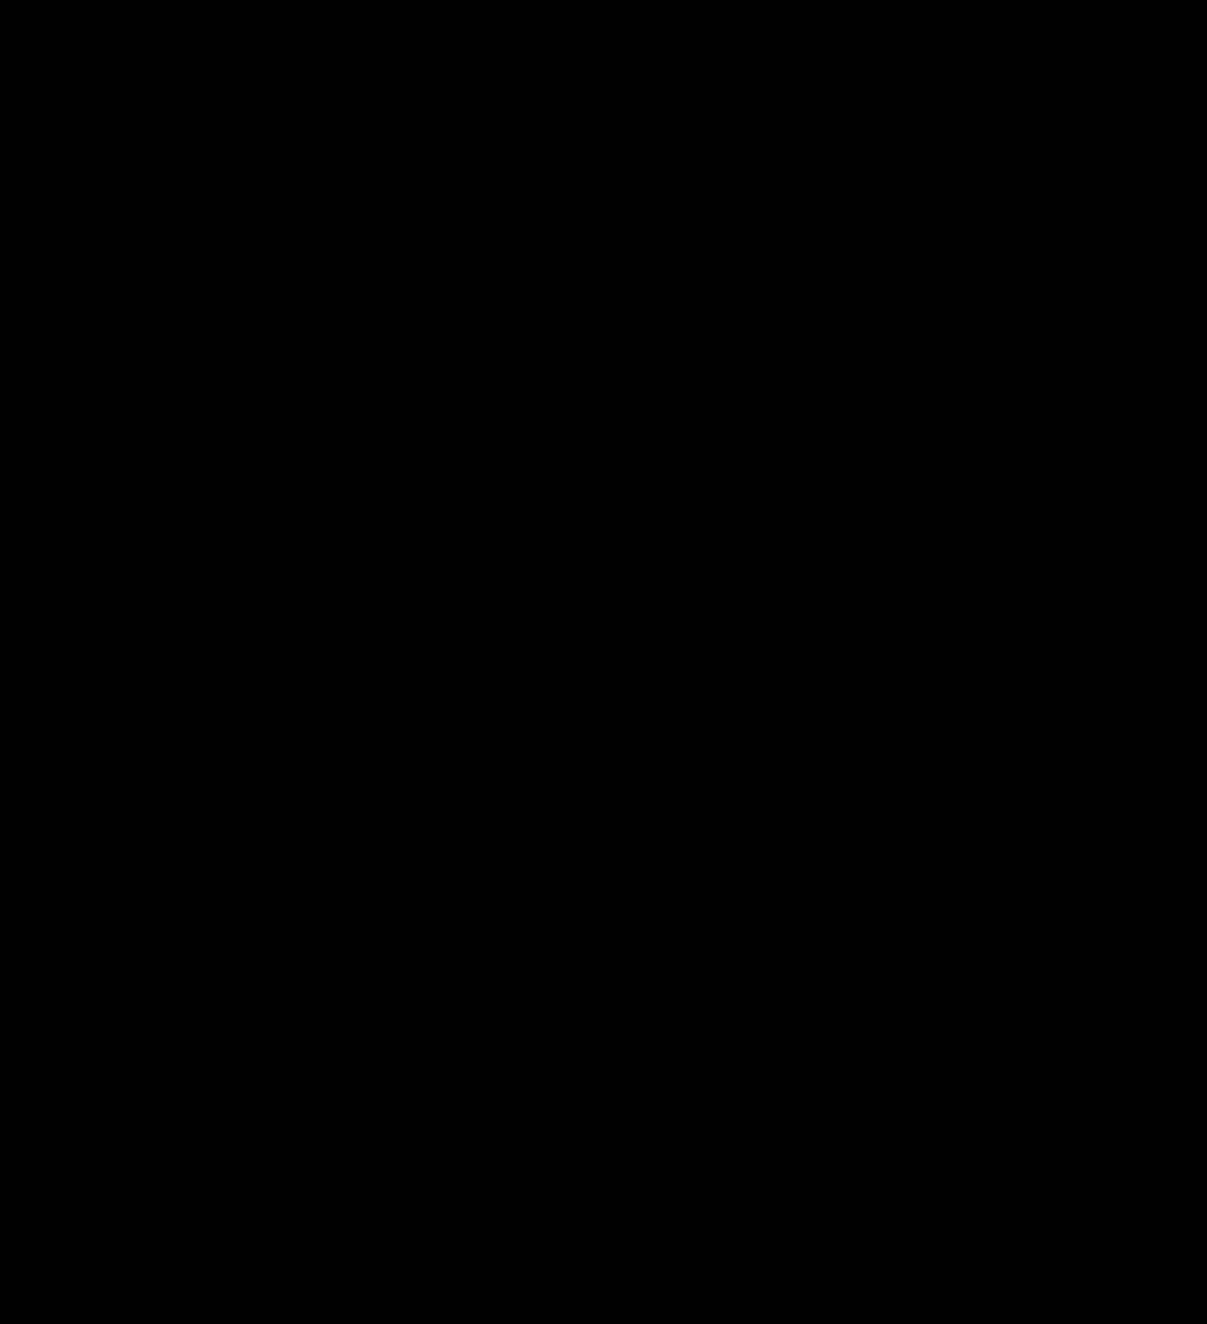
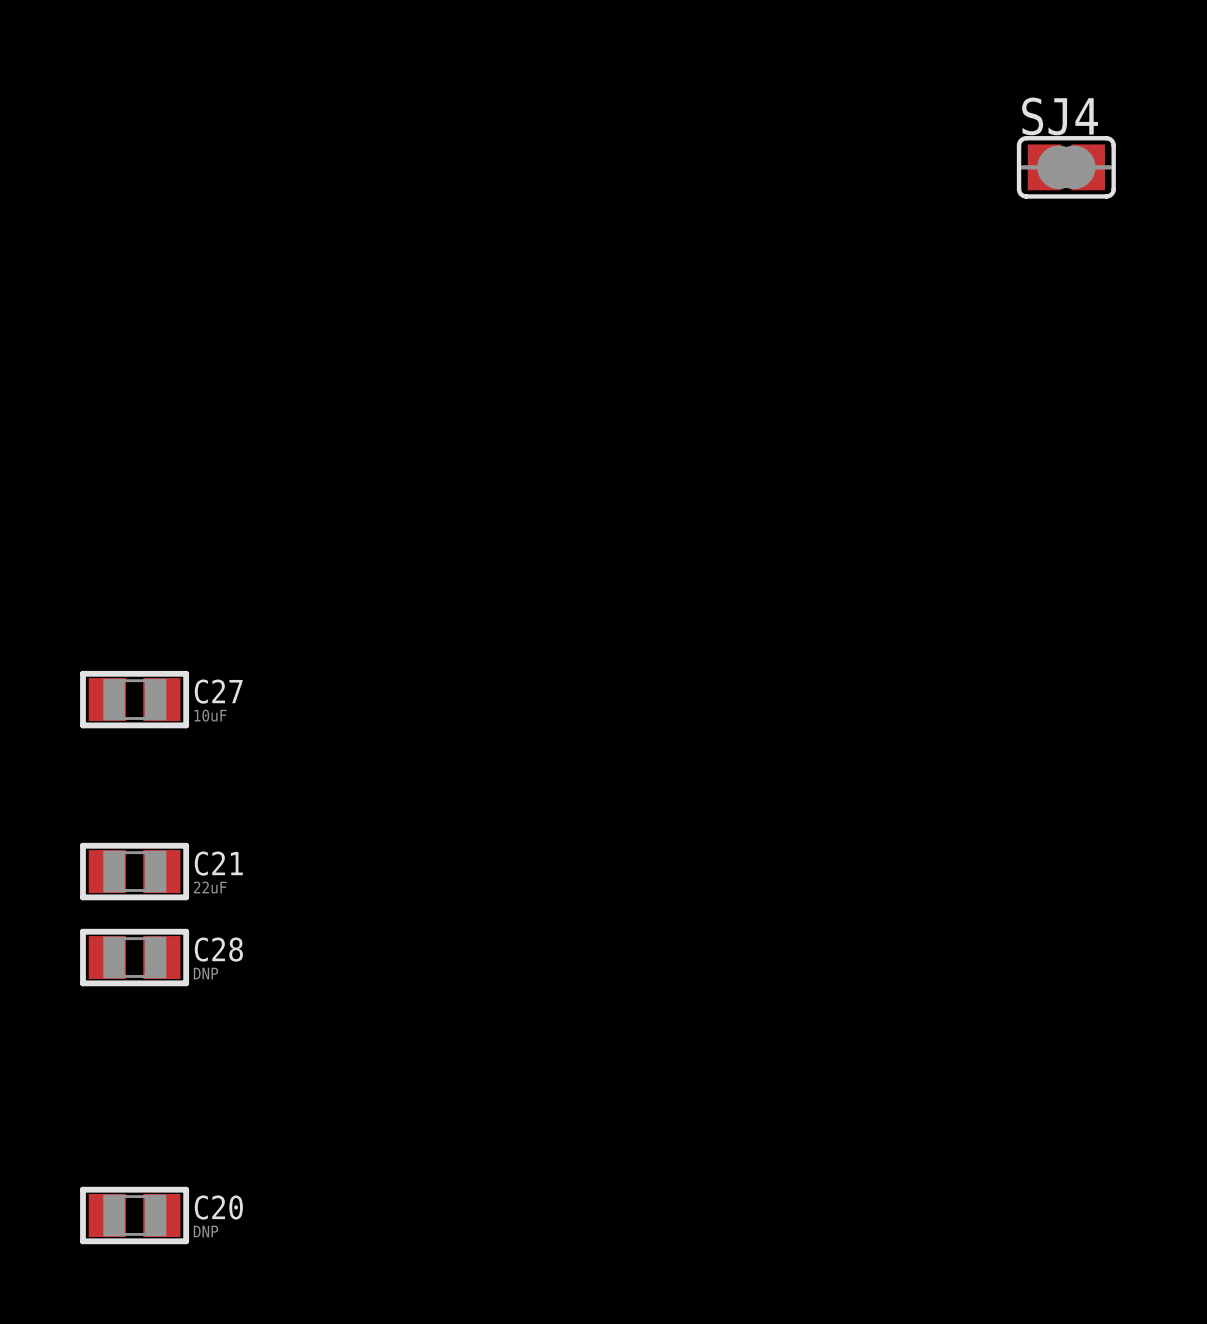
SJ4: none -> (1066, 167)
C27: none -> 10uF (134, 699)
C21: none -> 22uF (134, 871)
C28: none -> DNP (134, 957)
C20: none -> DNP (134, 1215)

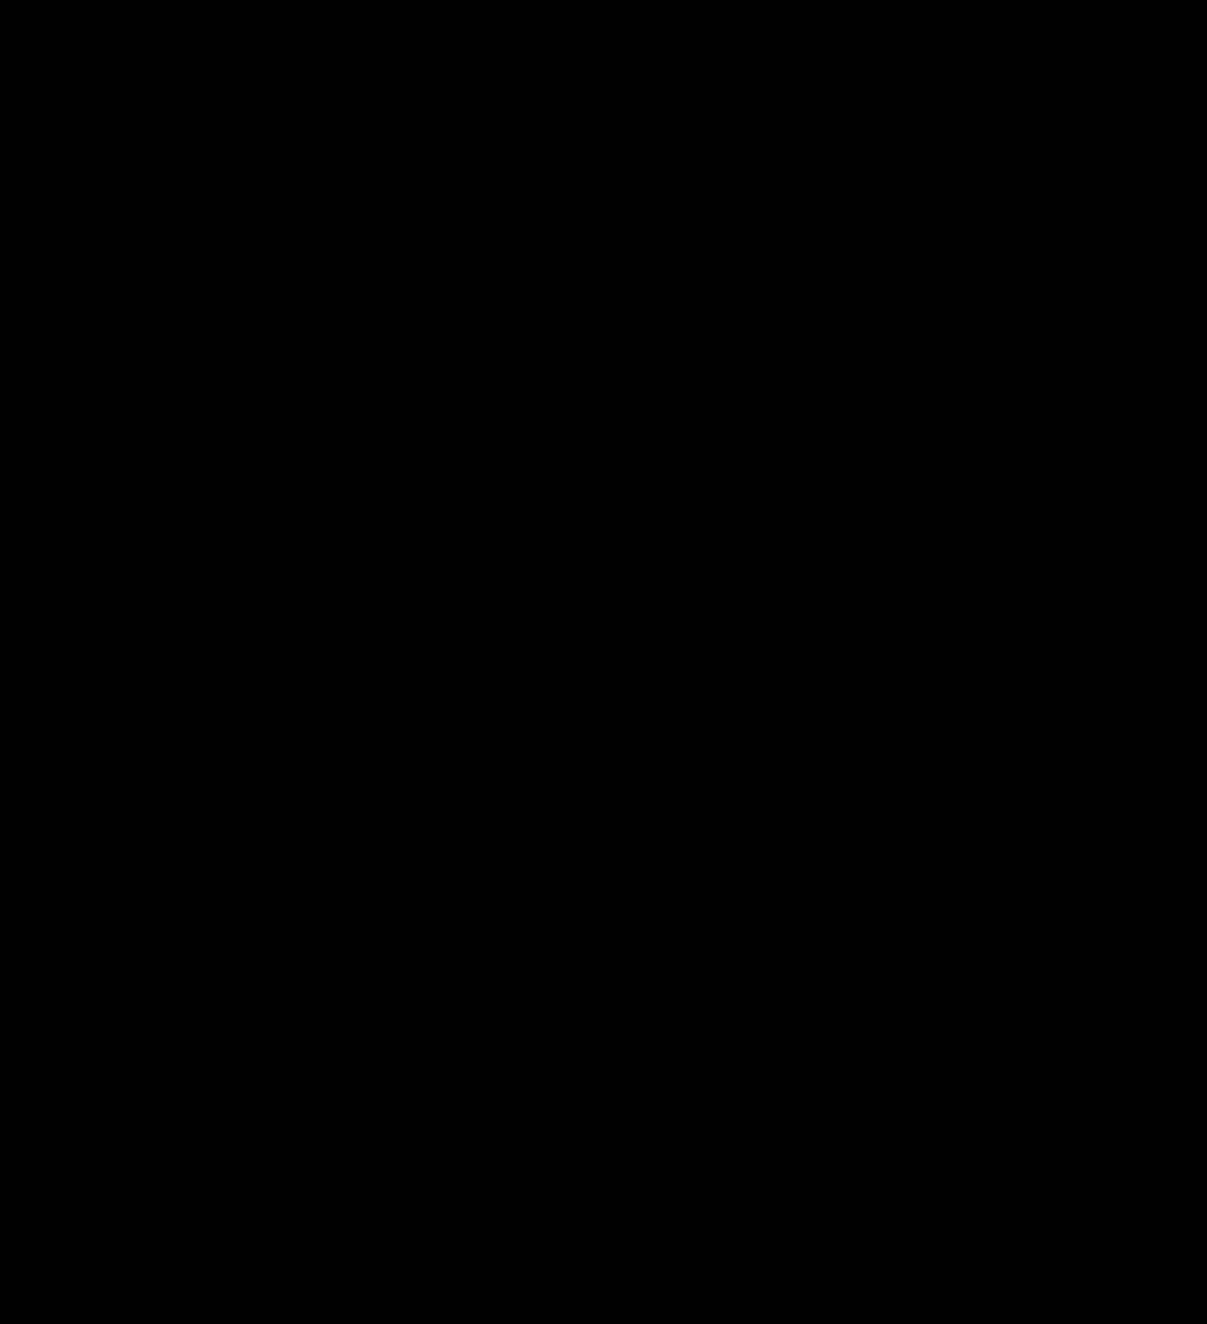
SJ4: (1066, 167) -> none
C27: 10uF (134, 699) -> none
C21: 22uF (134, 871) -> none
C28: DNP (134, 957) -> none
C20: DNP (134, 1215) -> none

